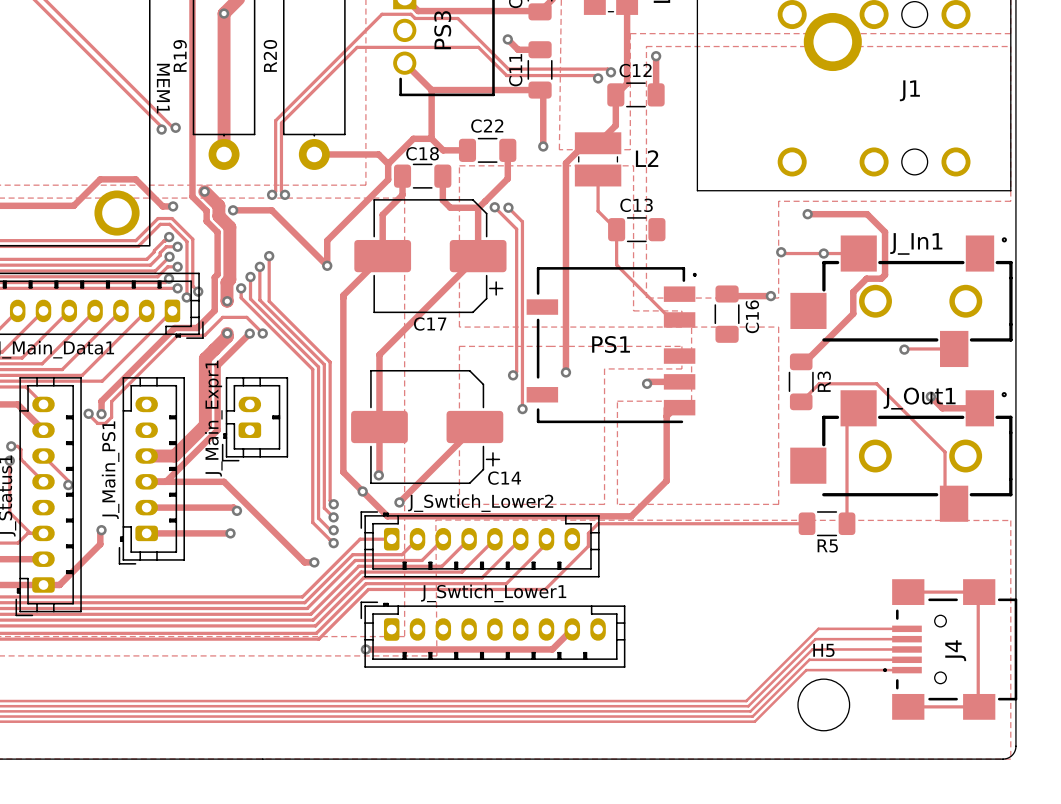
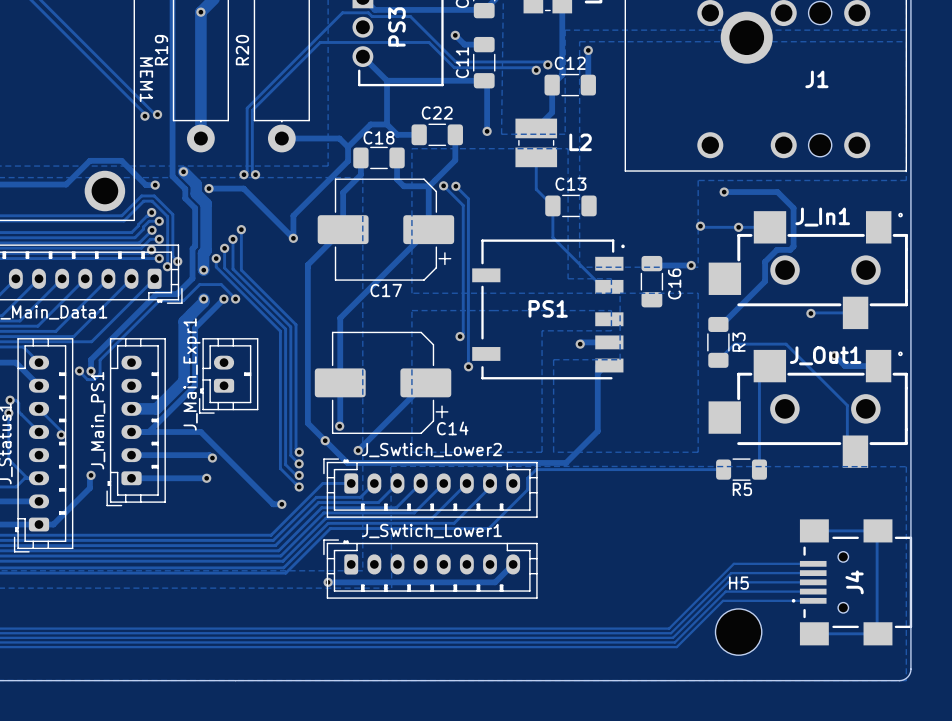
track: (598, 143) (585, 143) (565, 163) (565, 372) -> none
via: (565, 372) -> none
J_Swtich_Lower1 footprint: [360, 601, 626, 668] -> [323, 539, 538, 599]

